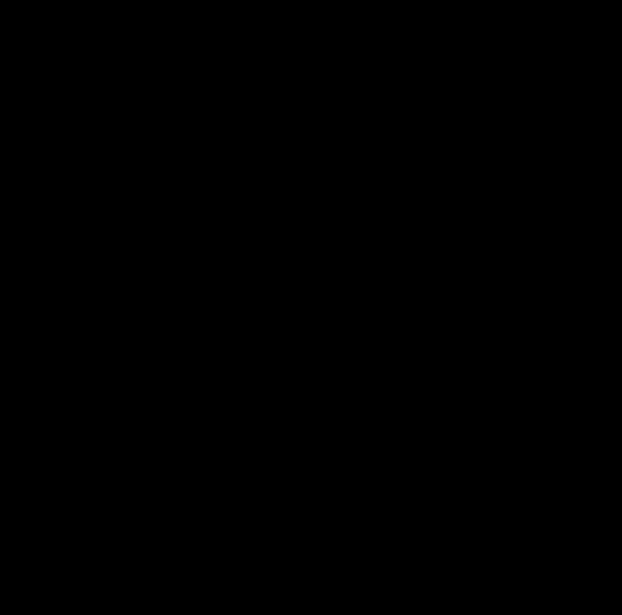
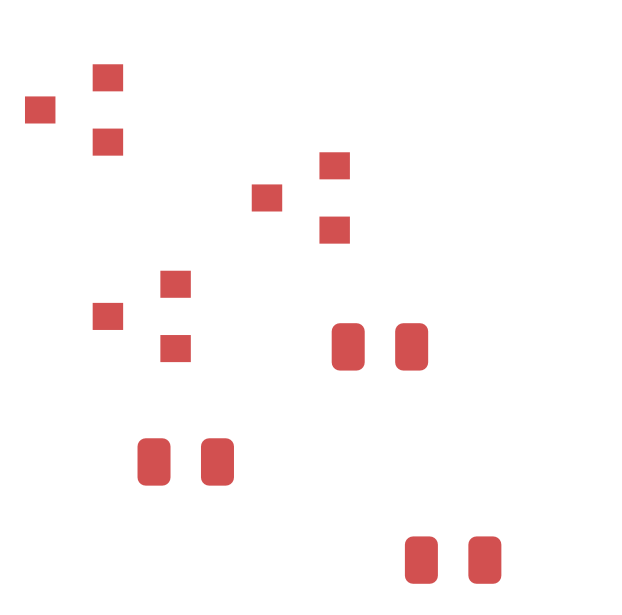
part: none -> (74, 109)
part: none -> (300, 197)
part: none -> (141, 316)
part: none -> (379, 346)
part: none -> (185, 461)
part: none -> (453, 560)

